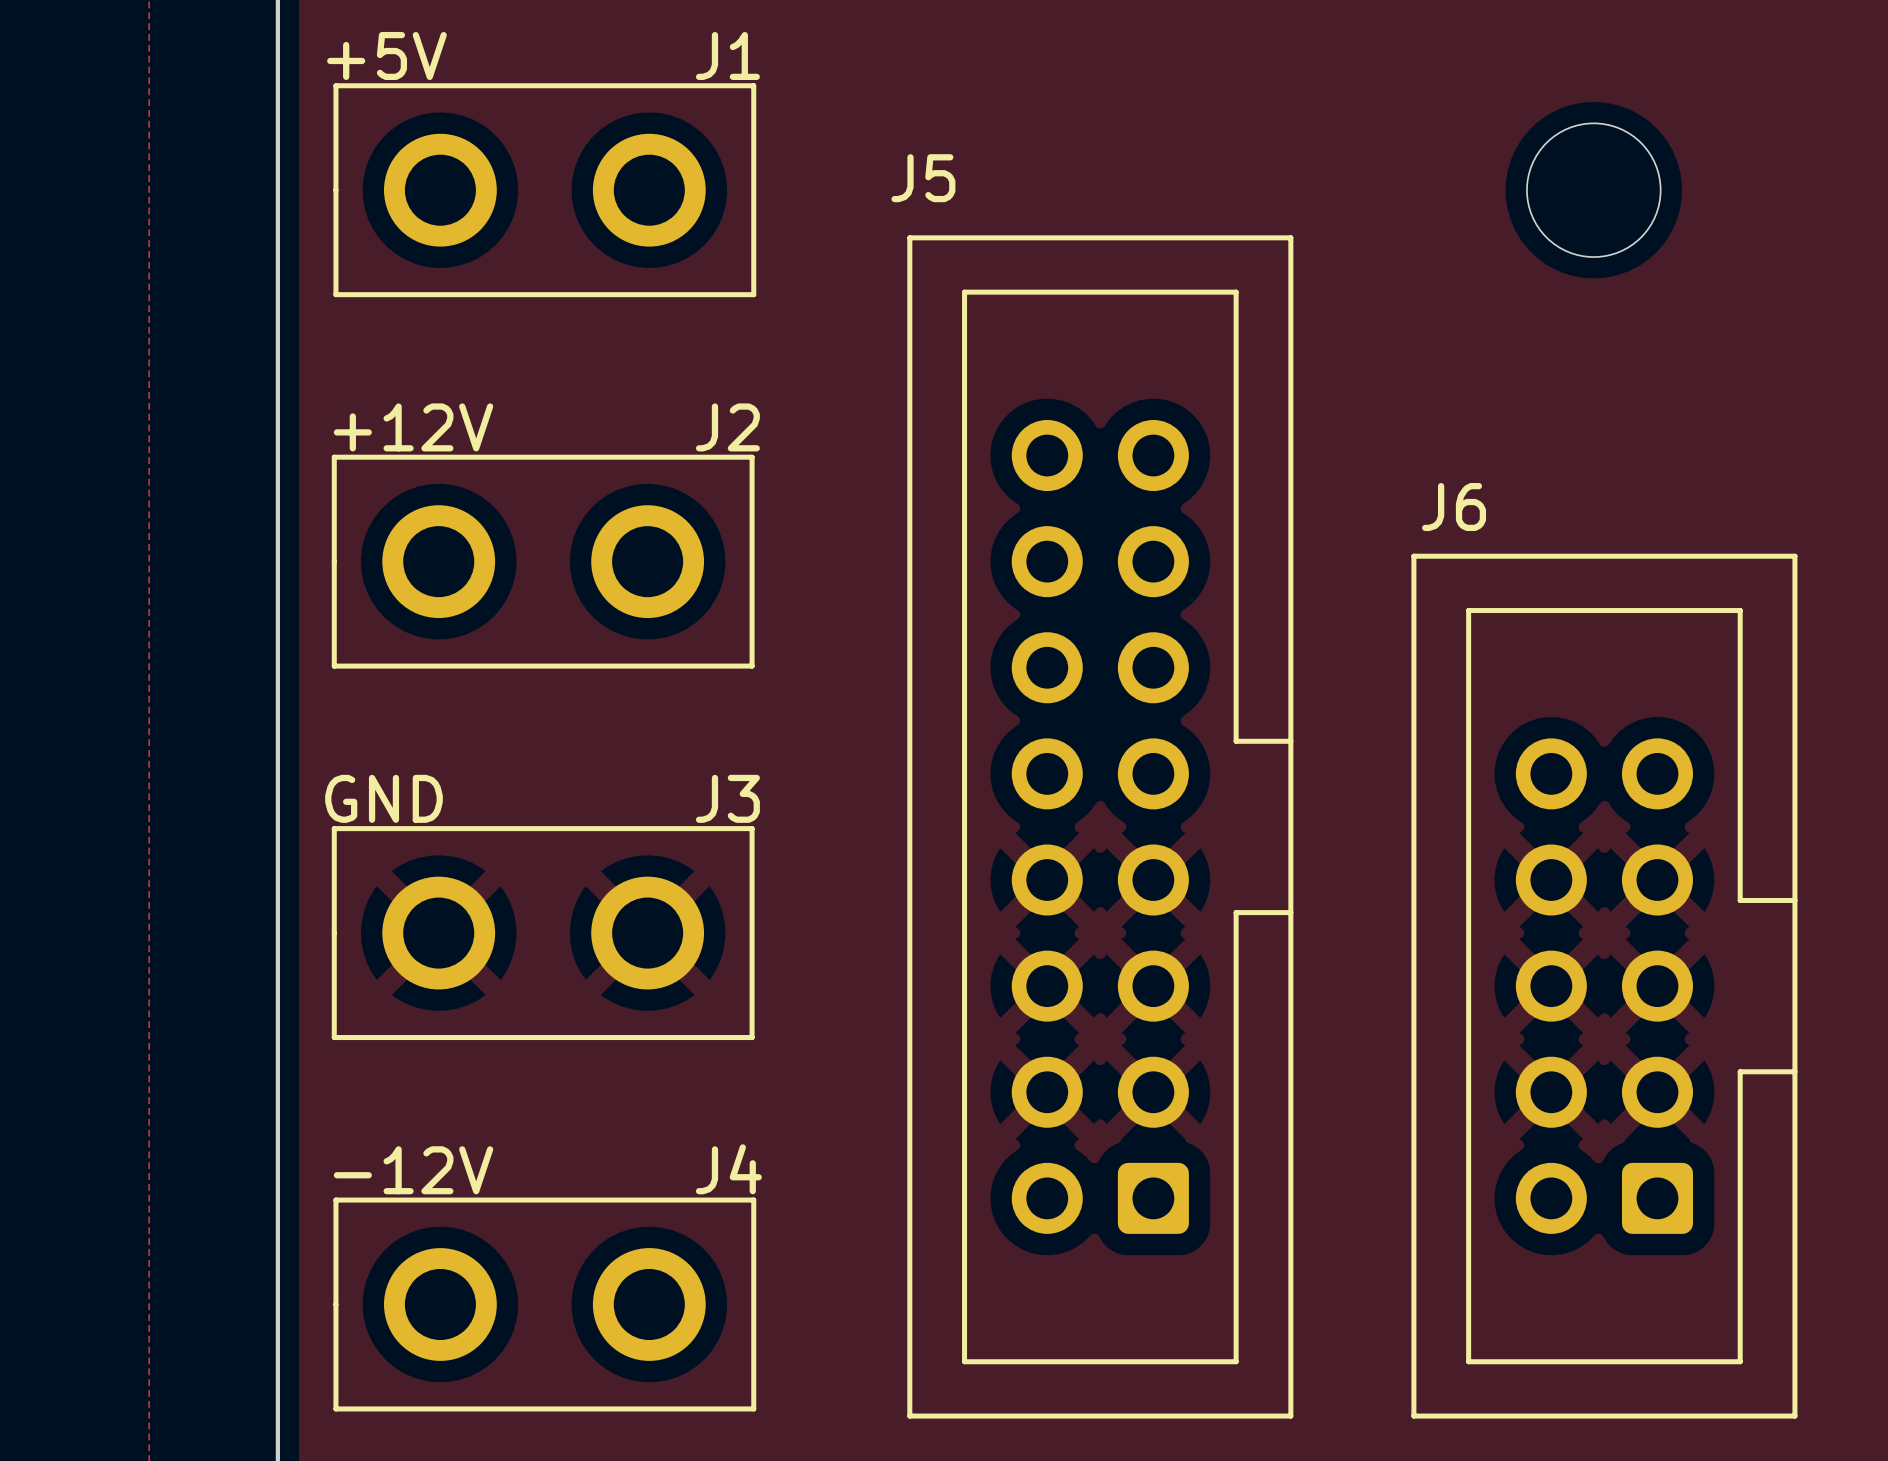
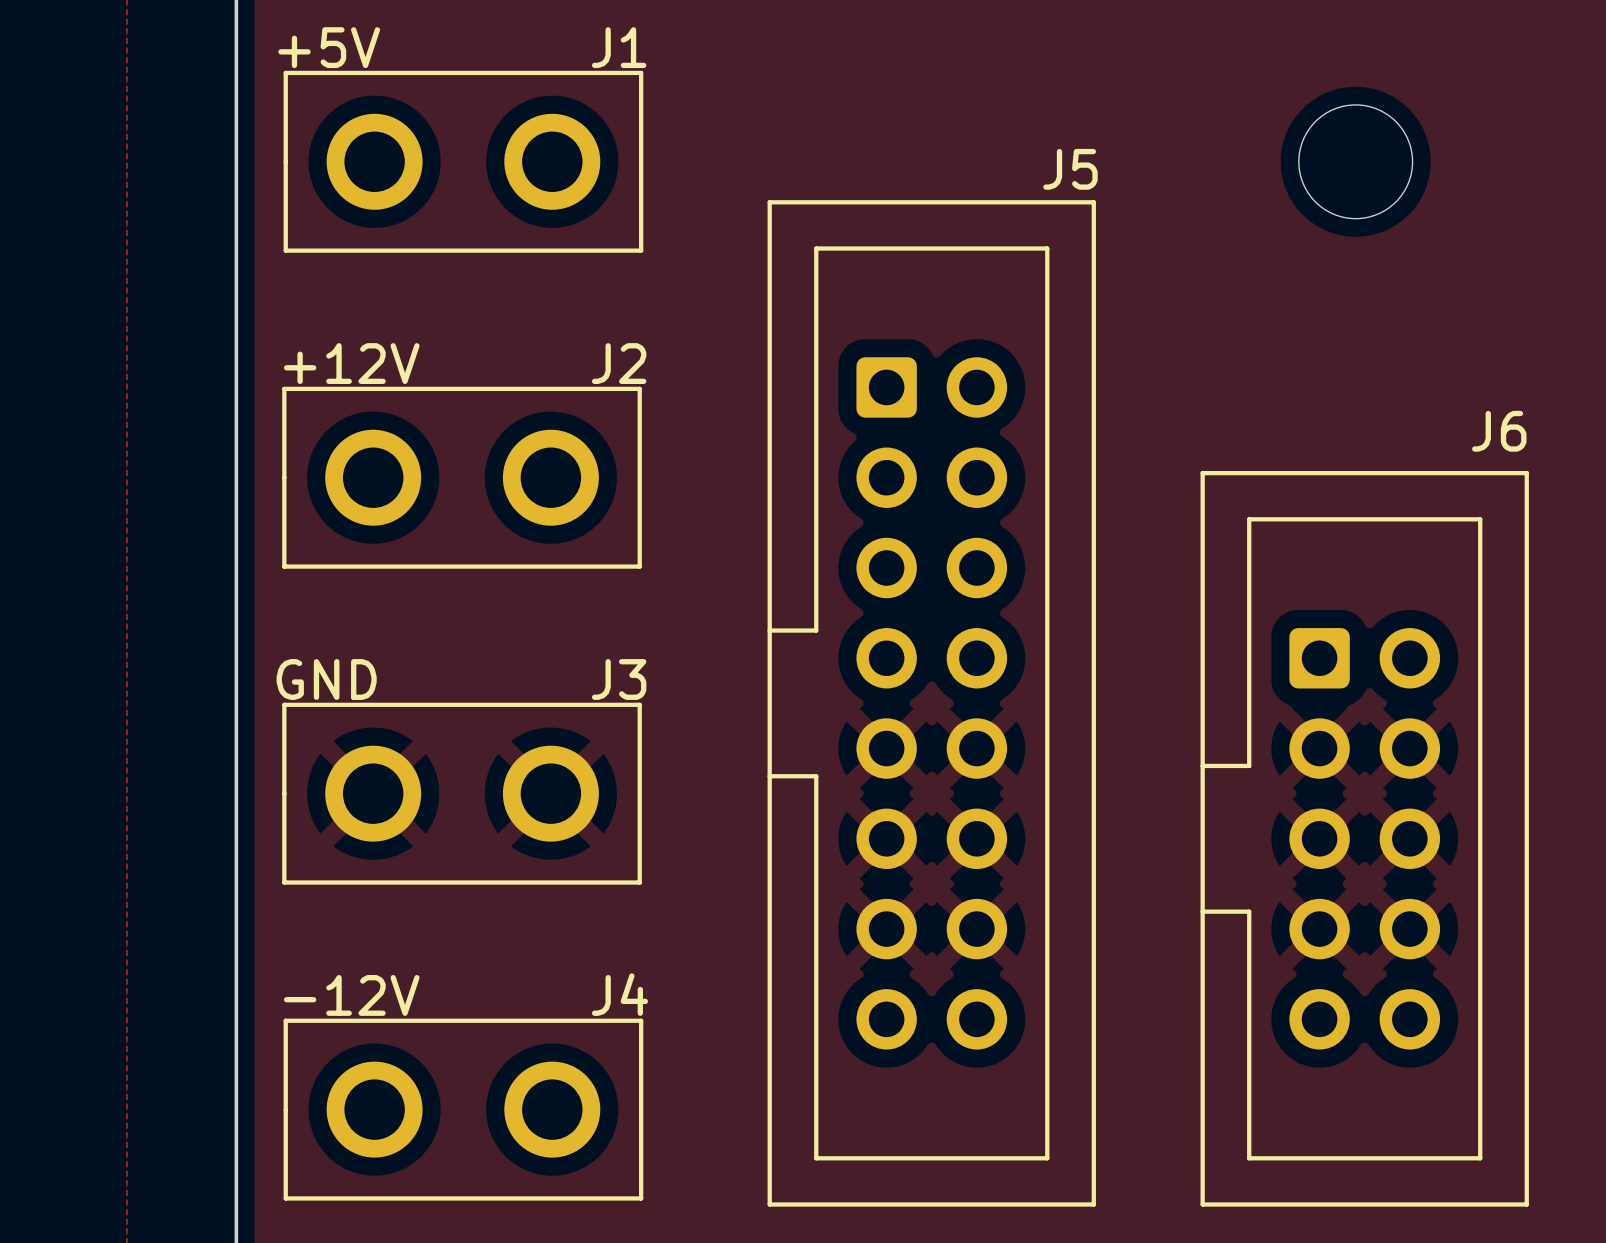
J5 name position: J5 (923, 178) -> J5 (1070, 169)
J6 name position: J6 (1454, 507) -> J6 (1499, 431)
J5 rotation: 0° (1100, 826) -> 180° (931, 703)
J6 rotation: 0° (1604, 986) -> 180° (1364, 838)

